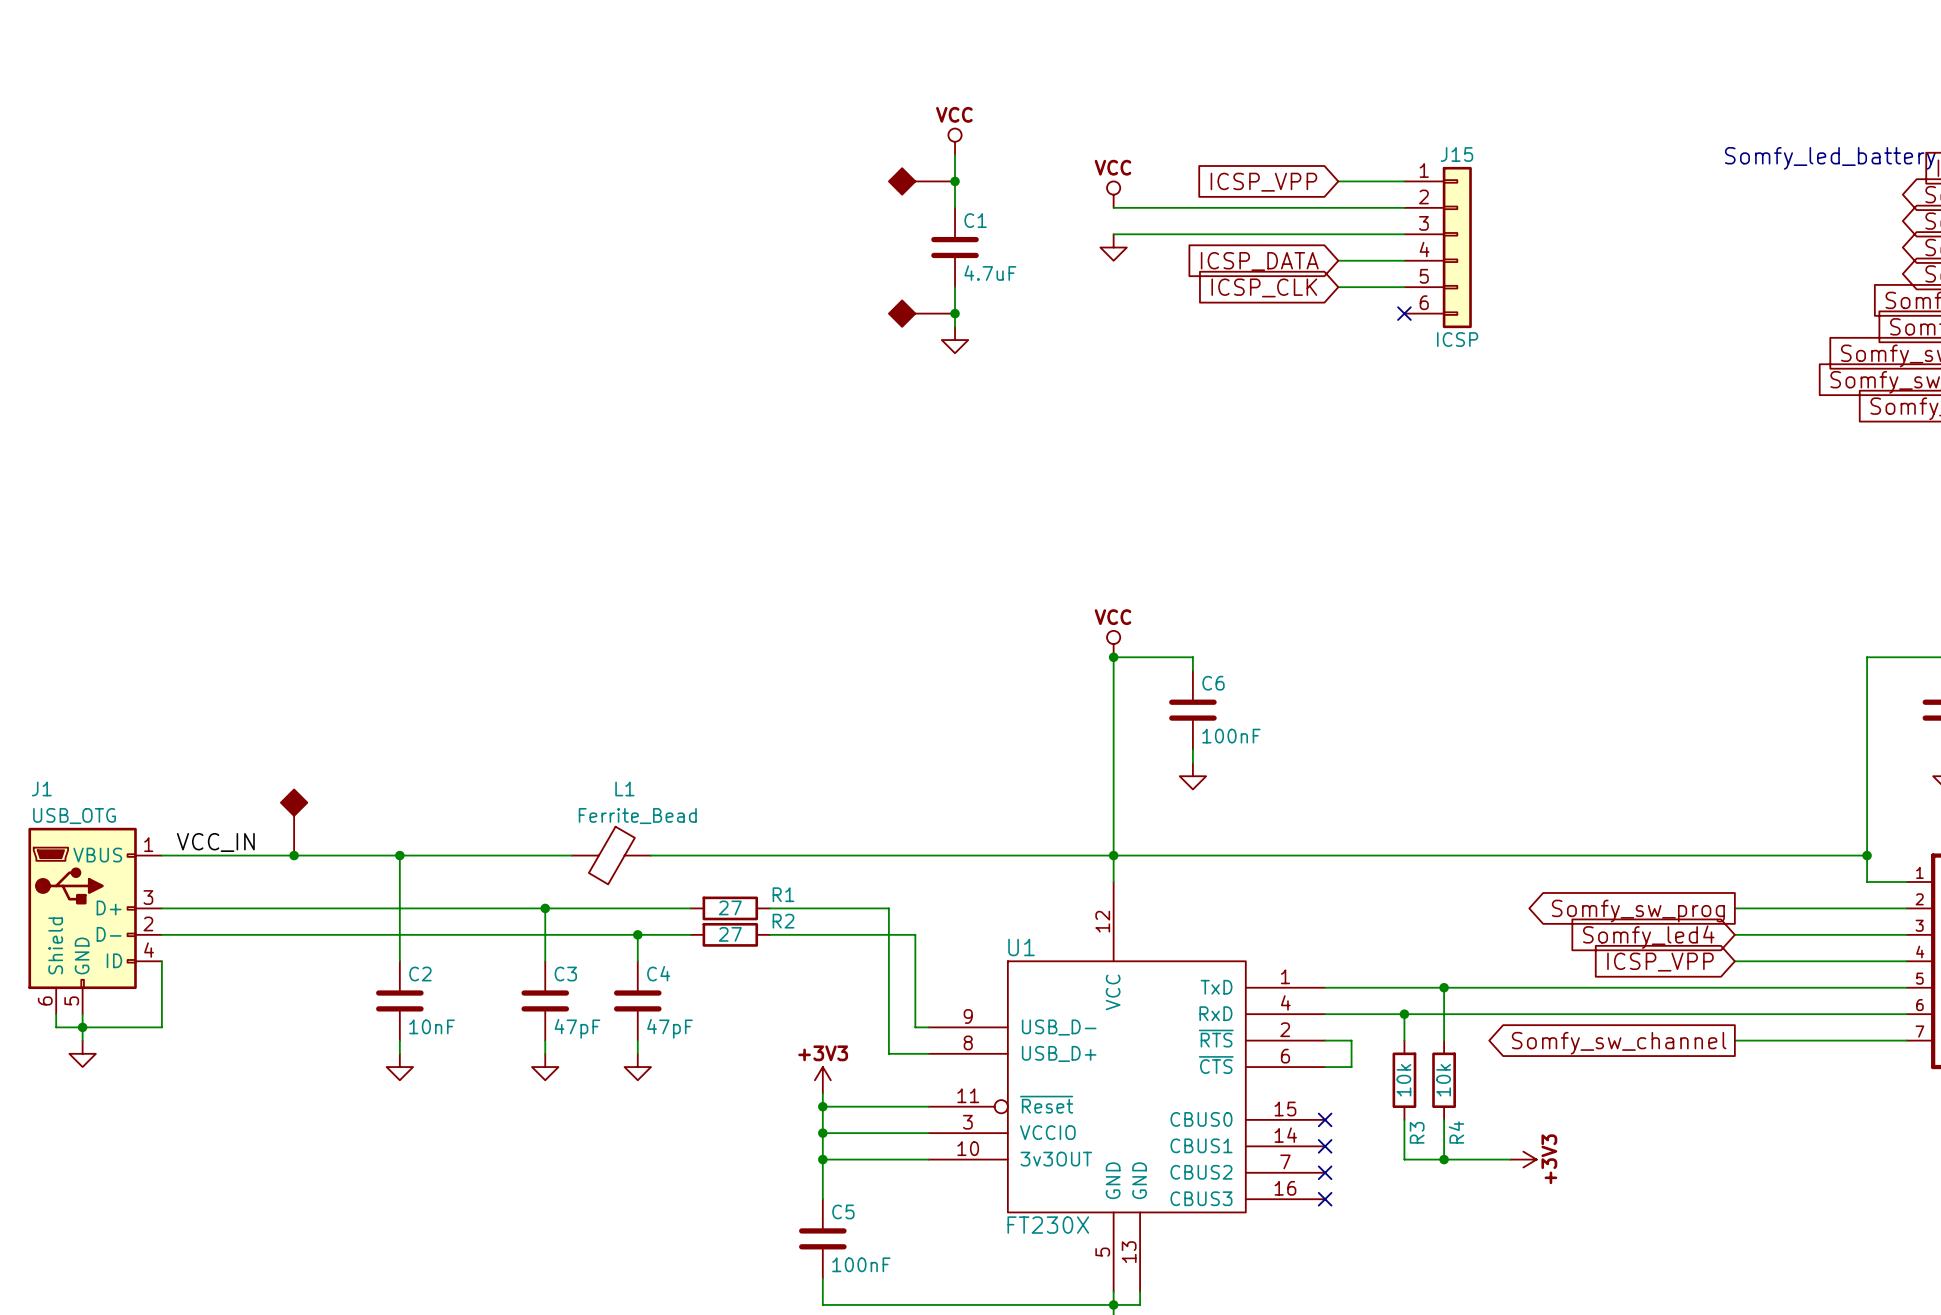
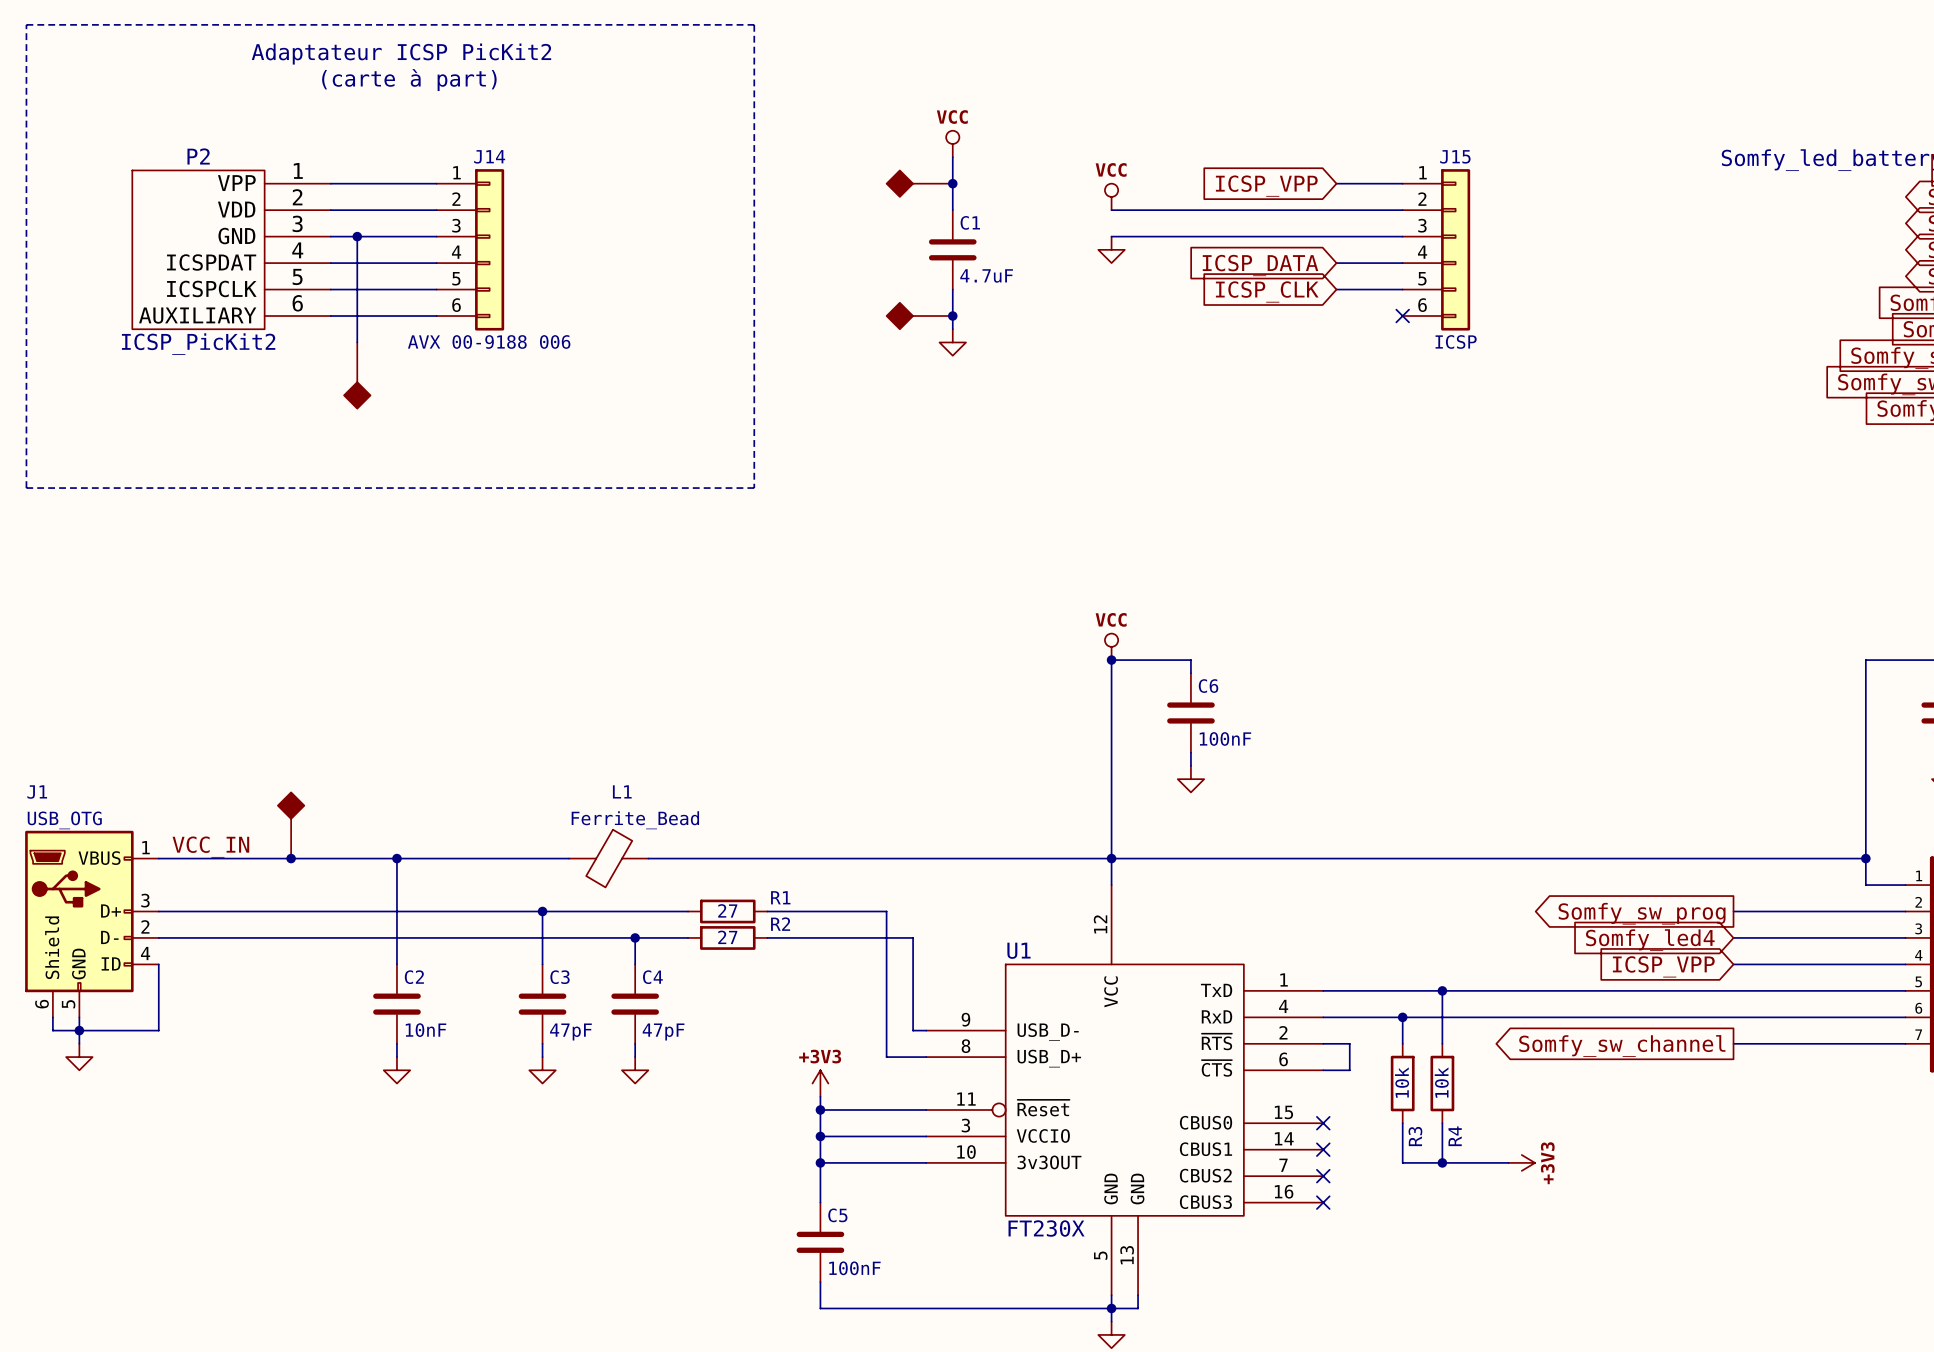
line: none -> (26, 24) (754, 24) (754, 488) (26, 488) (26, 24)
text: none -> Adaptateur ICSP PicKit2 (401, 54)
text: none -> (carte à part) (409, 80)
wire: none -> (330, 183) (436, 183)
wire: none -> (330, 210) (436, 210)
wire: none -> (330, 236) (436, 236)
wire: none -> (357, 236) (357, 342)
junction: none -> (357, 236)
P2: none -> ICSP_PicKit2 (231, 249)
J14: none -> AVX 00-9188 006 (470, 249)
wire: none -> (330, 263) (436, 263)
wire: none -> (330, 289) (436, 289)
wire: none -> (330, 316) (436, 316)
power symbol: none -> (357, 375)

